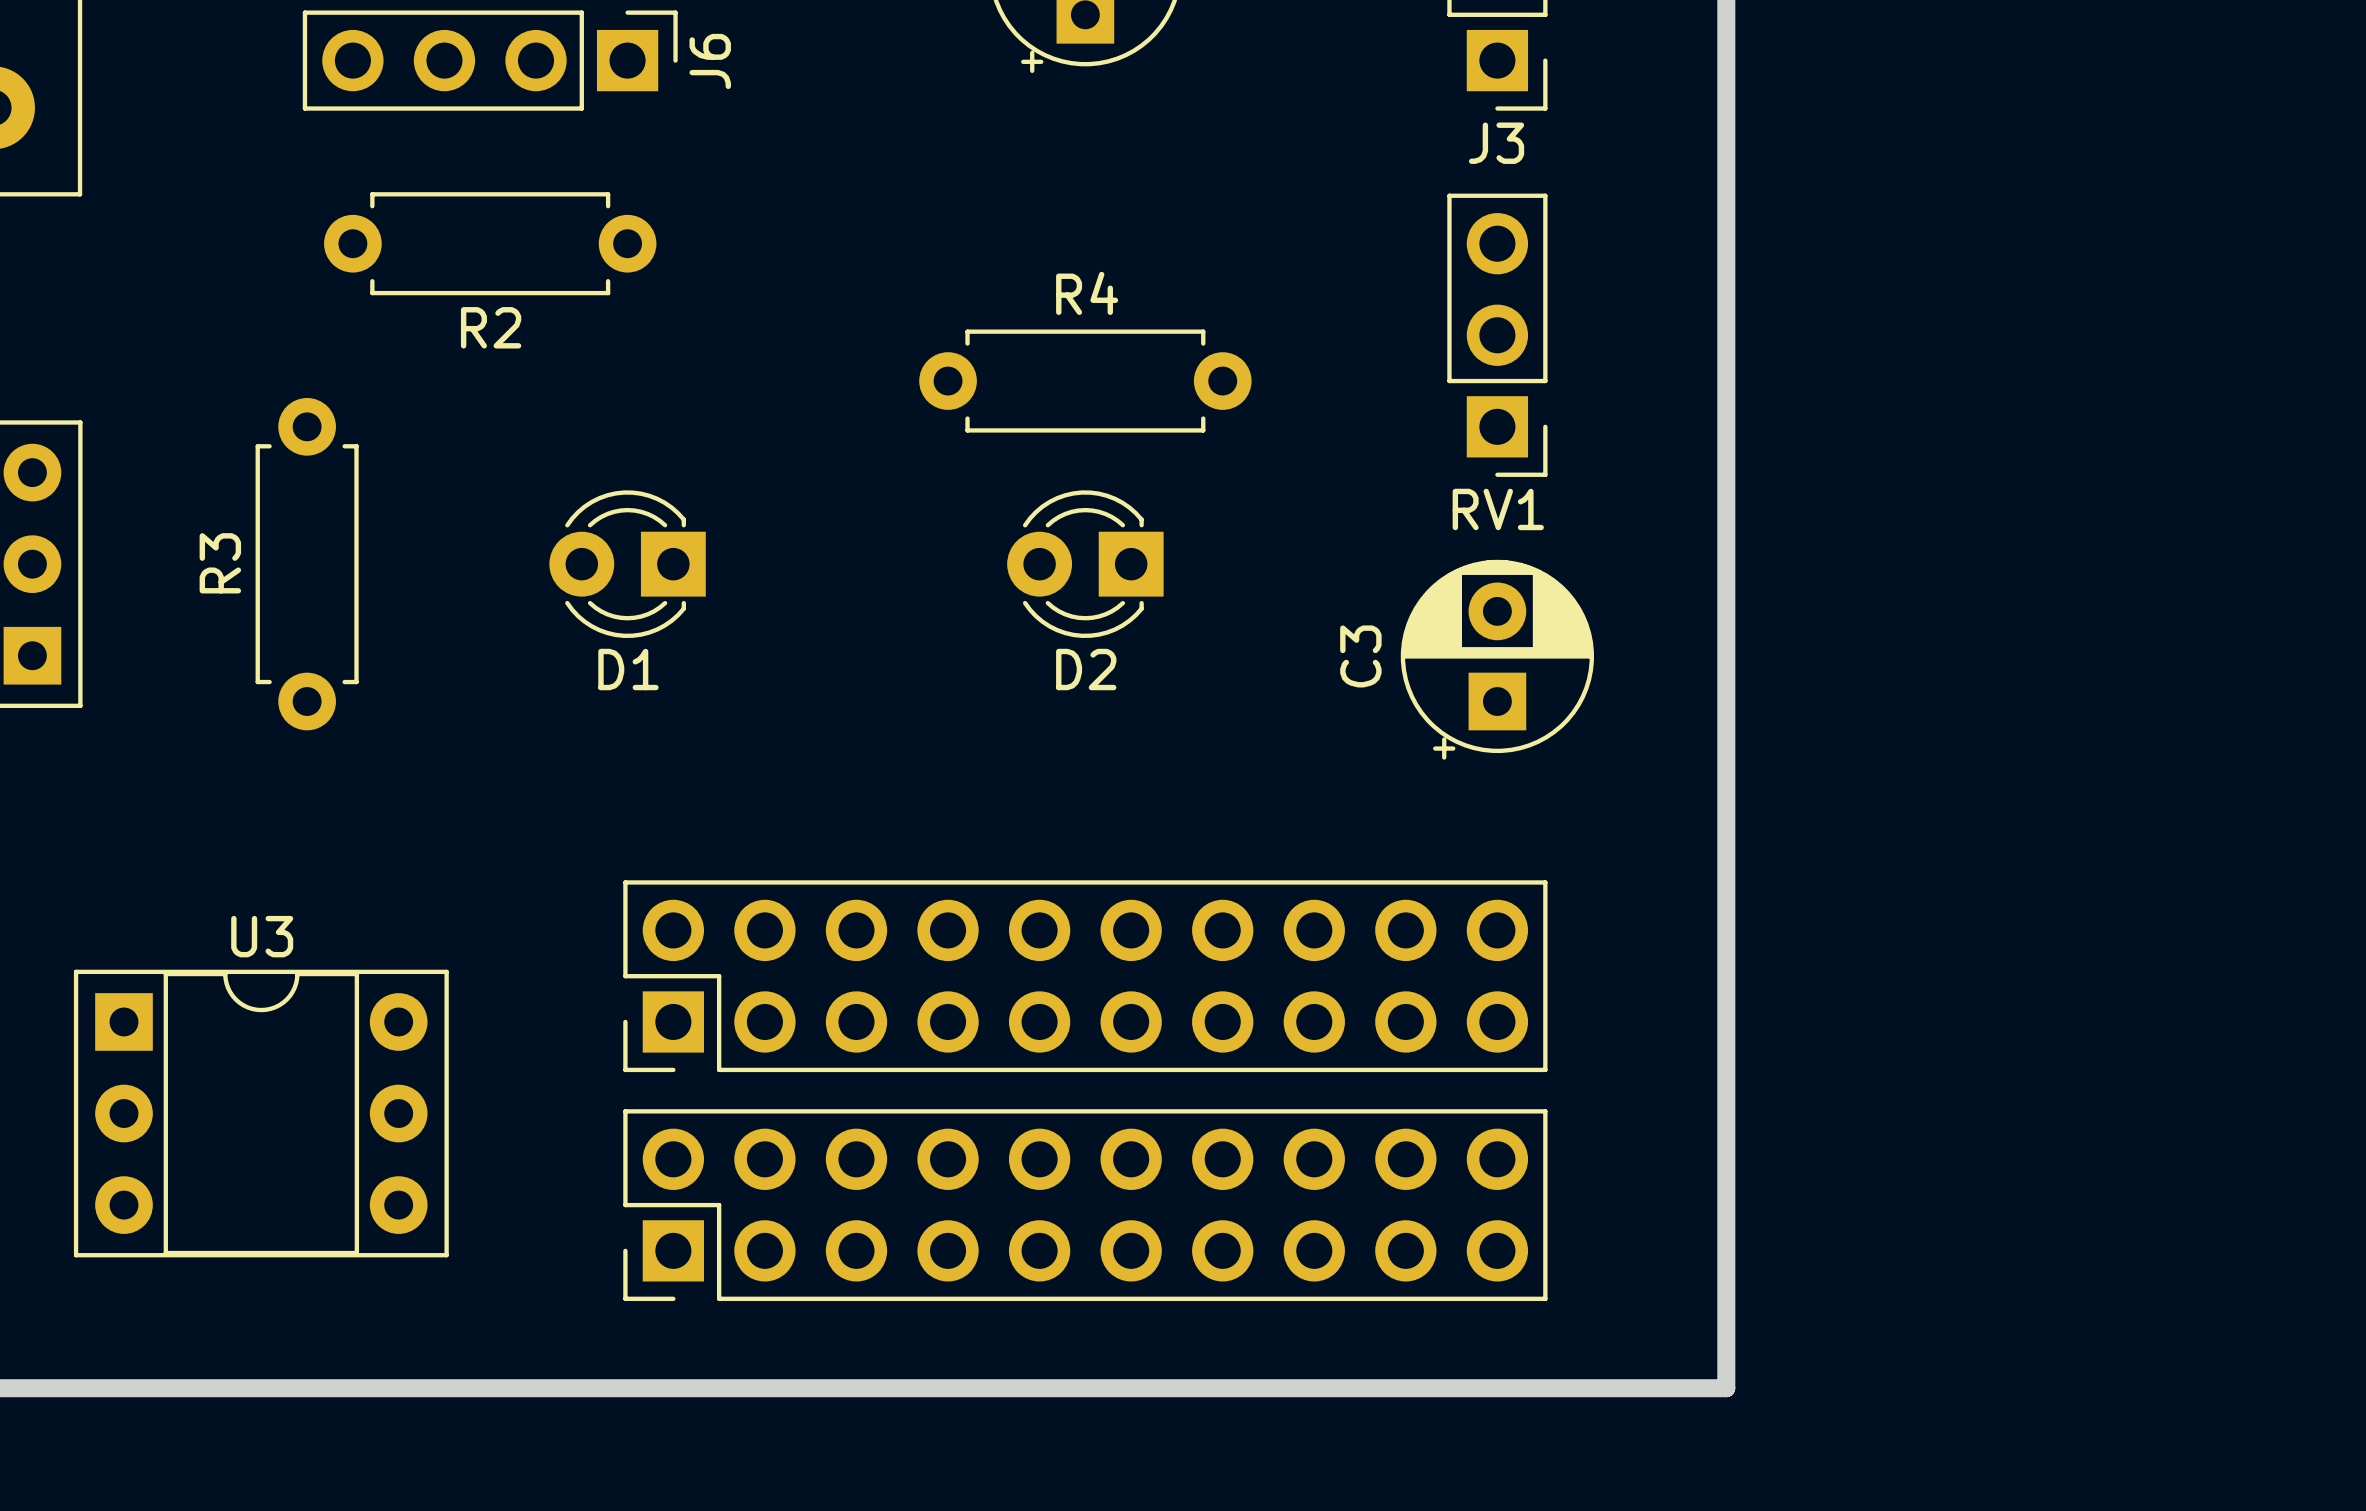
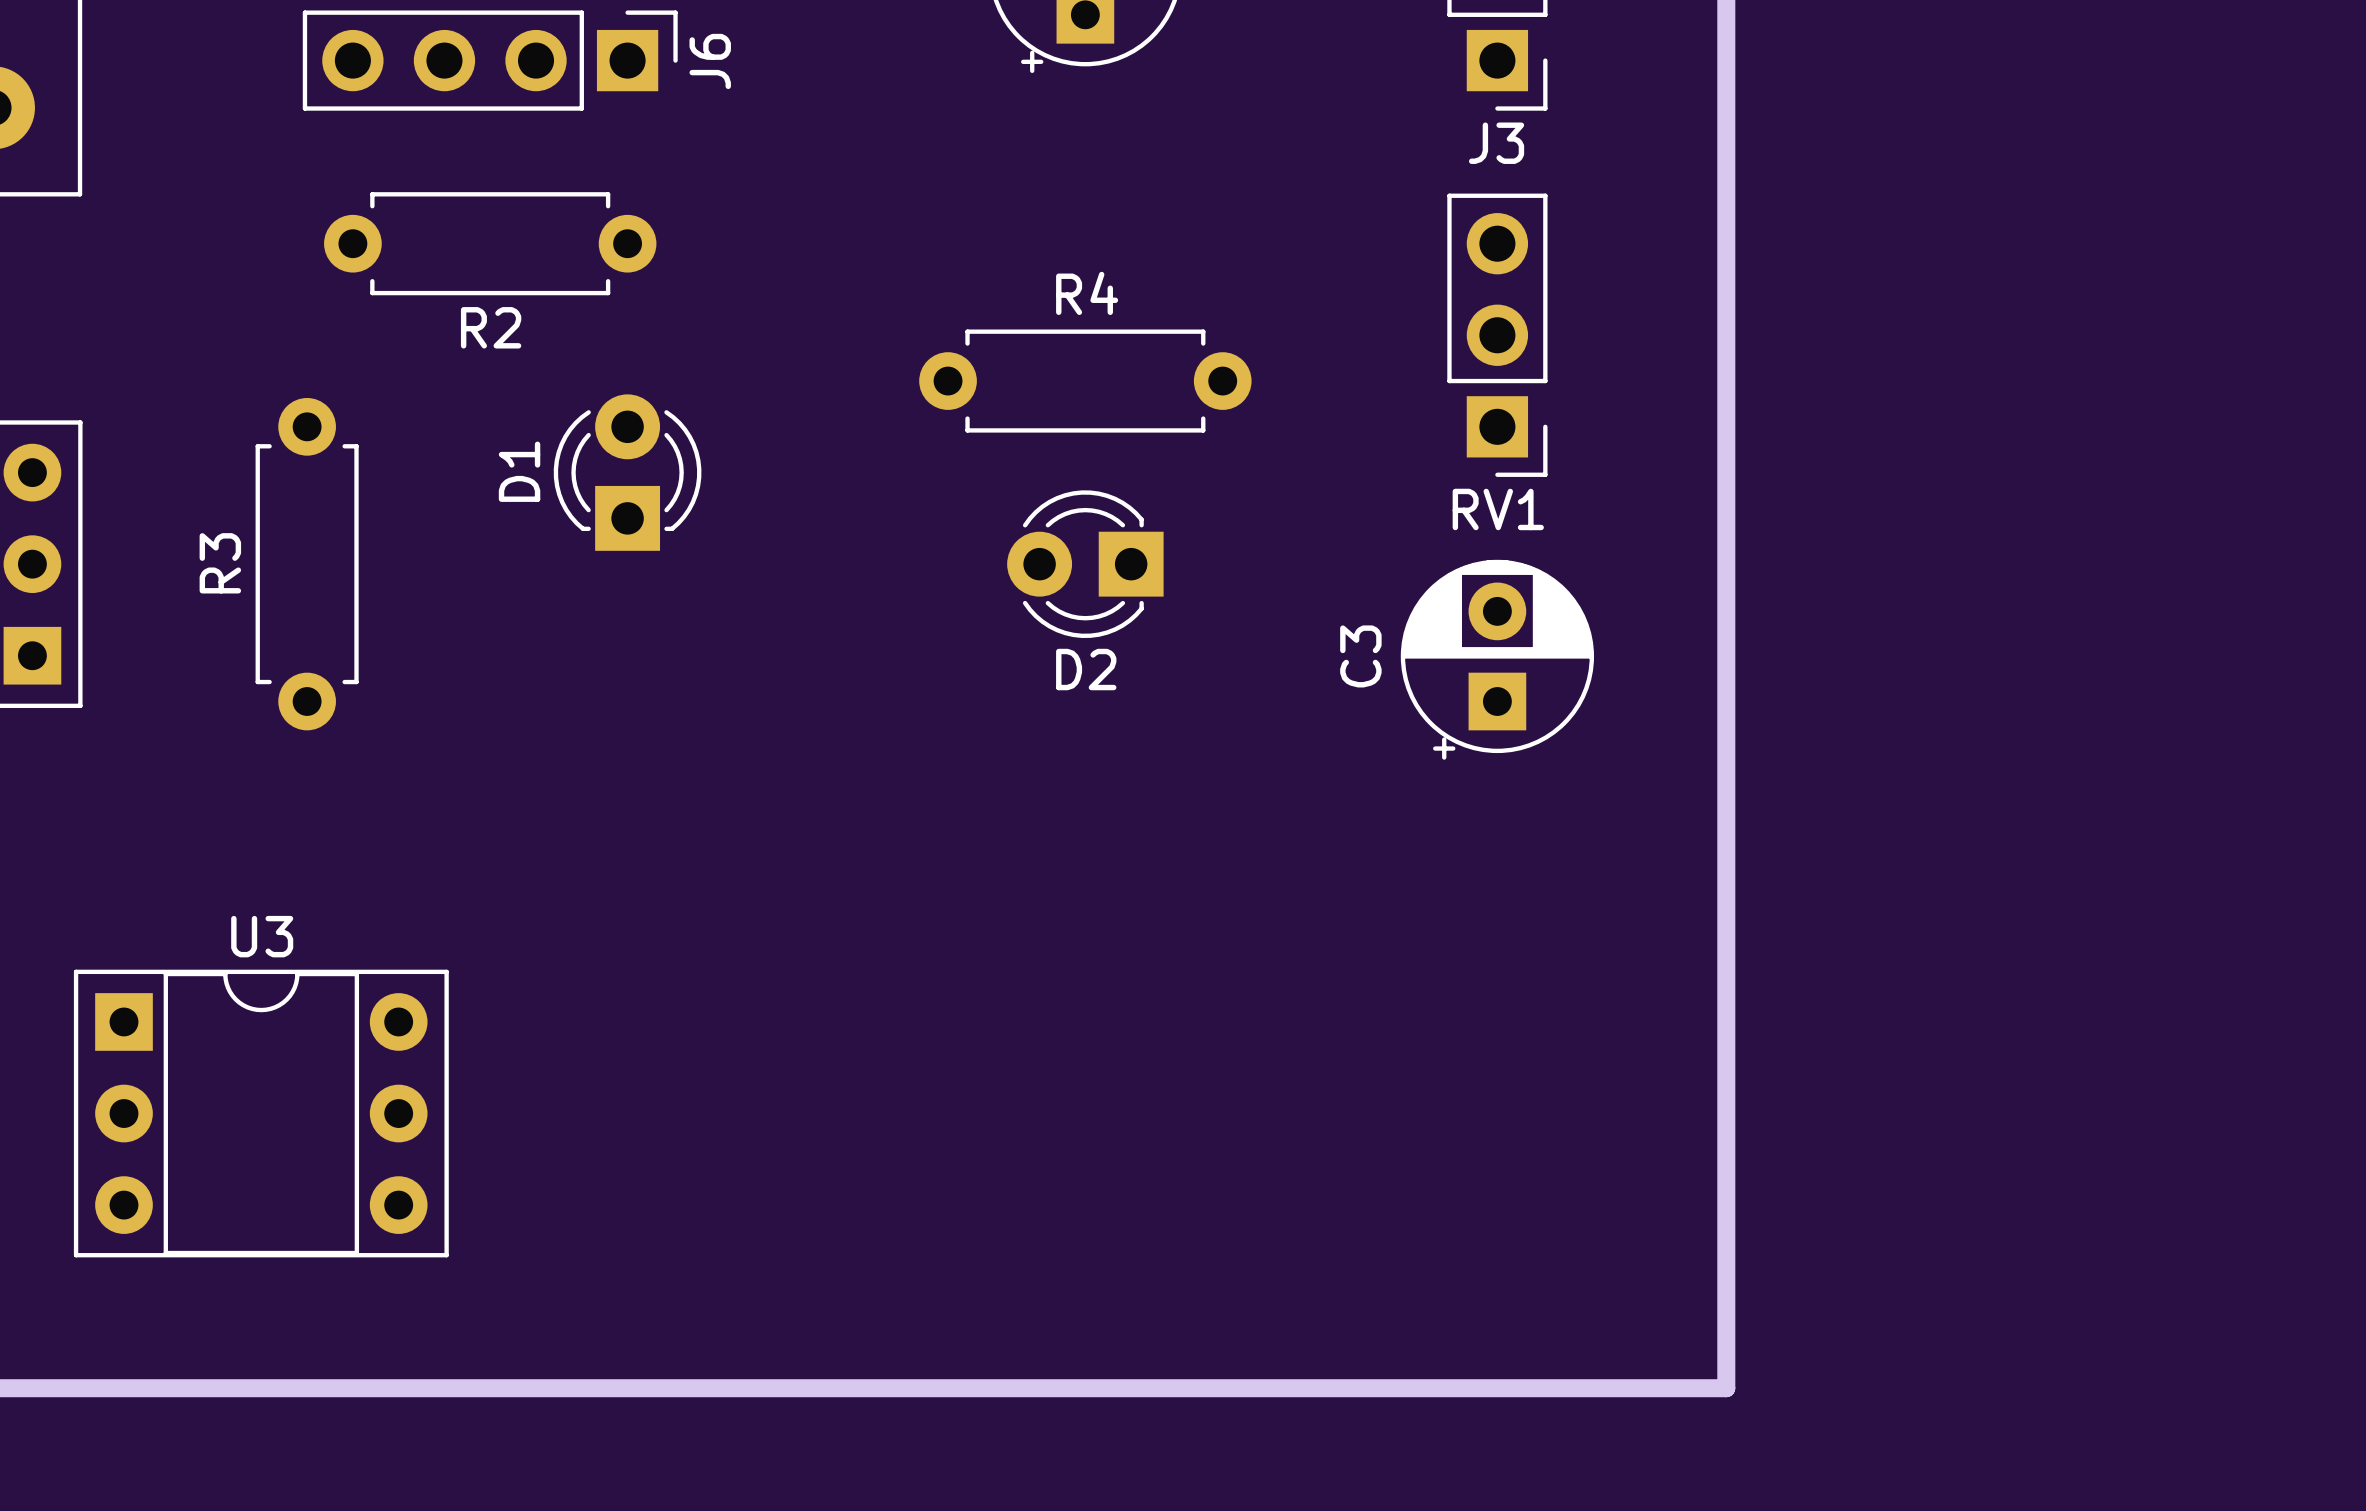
D1 rotation: 0° (627, 564) -> 90° clockwise (627, 472)
part: (1085, 976) -> none
part: (1085, 1205) -> none

